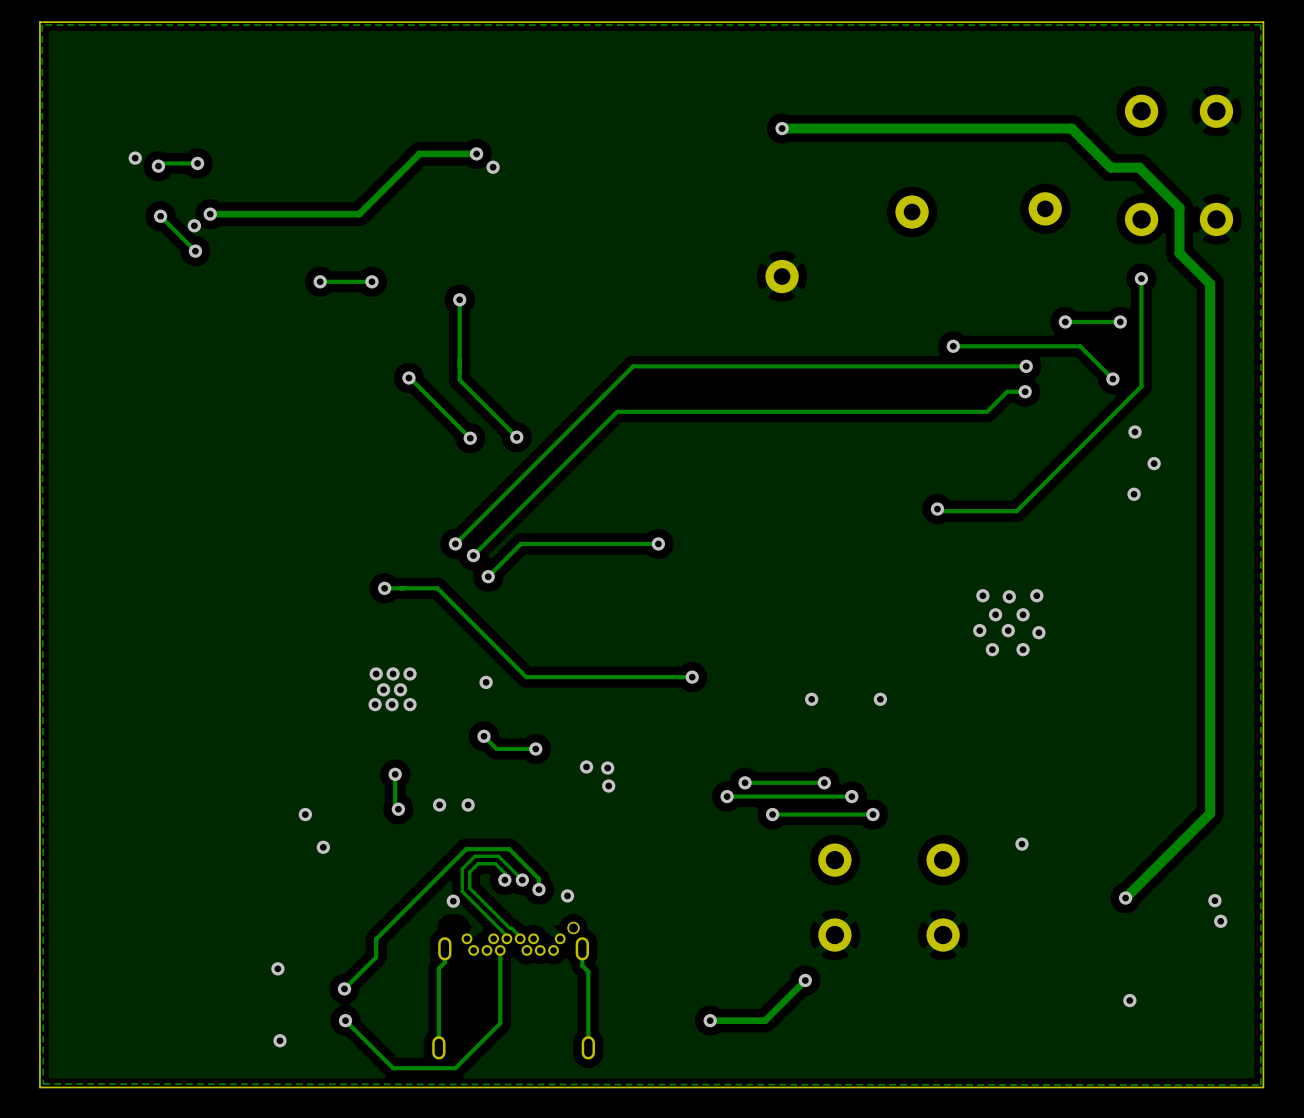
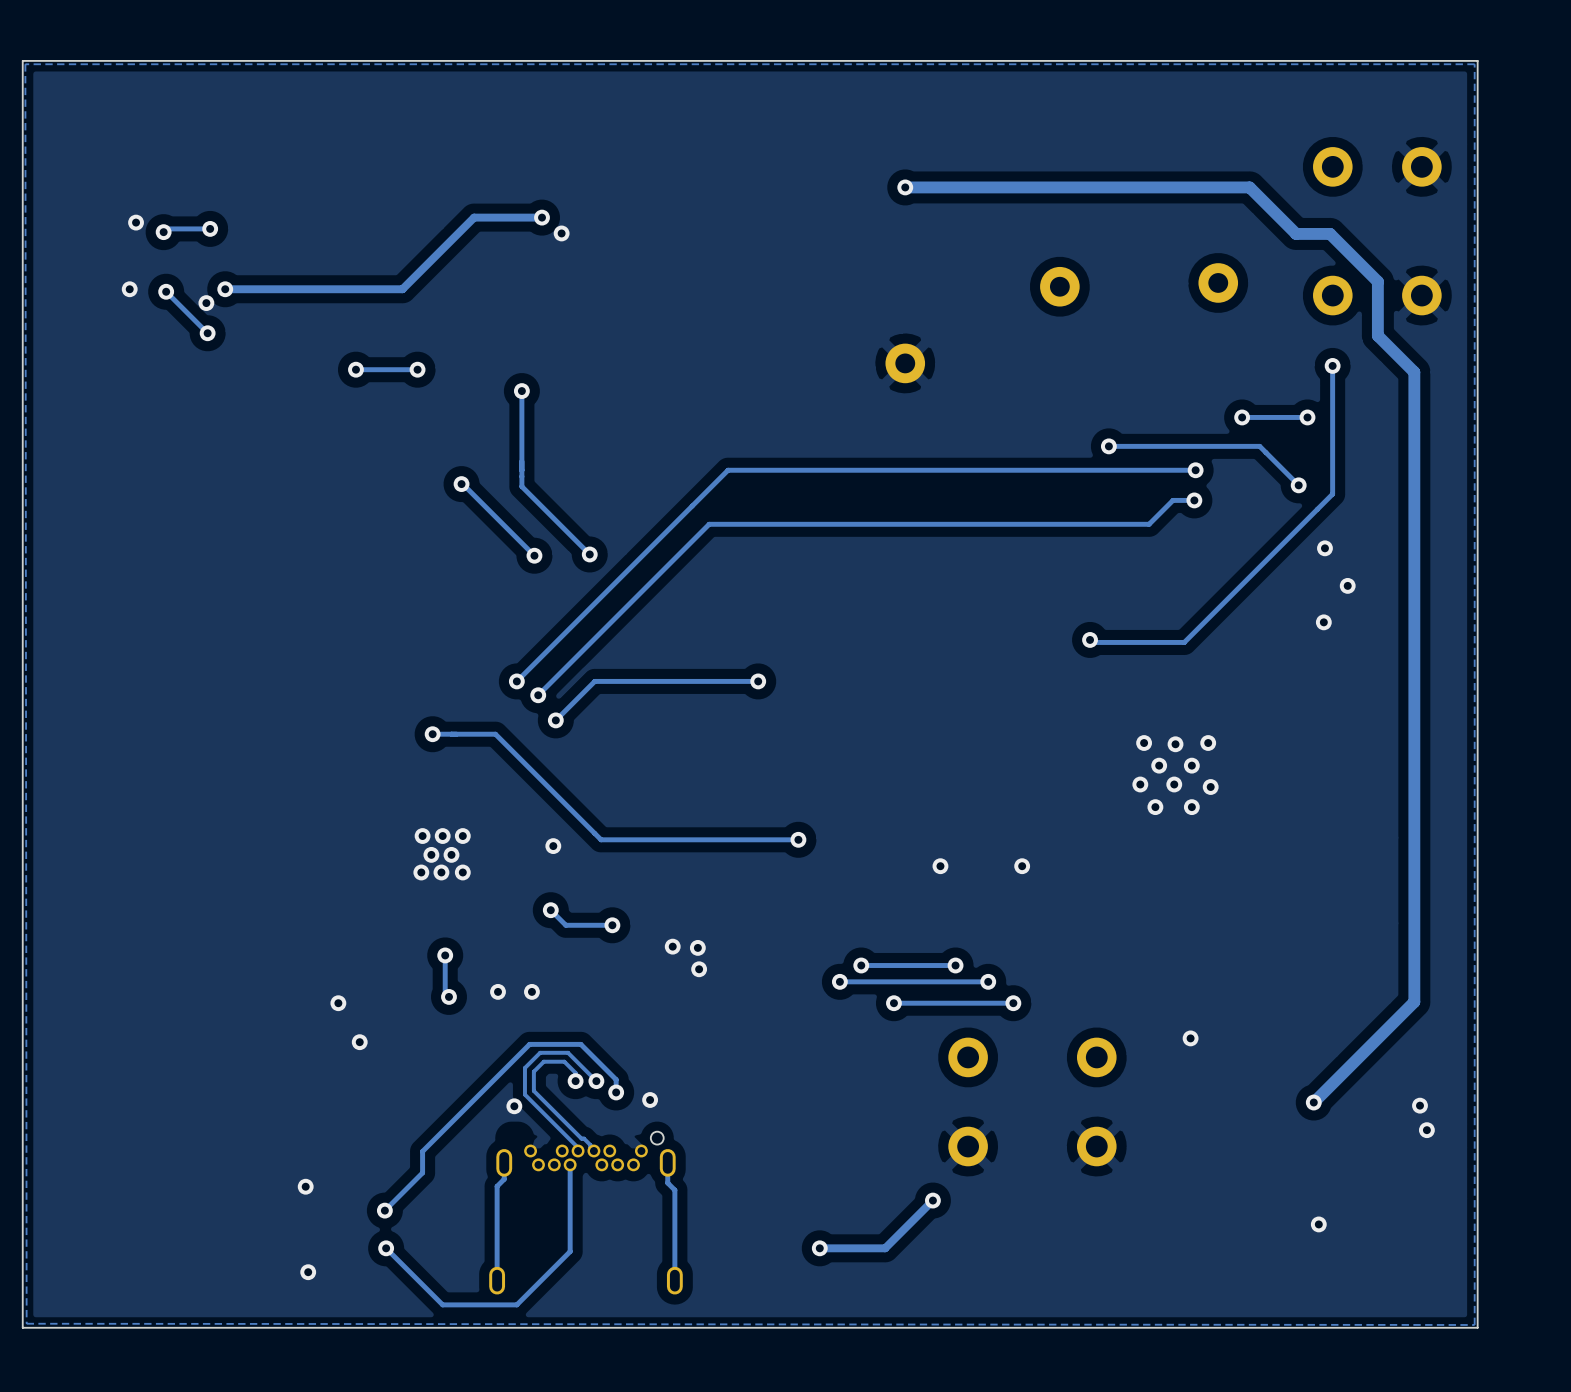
via: none -> (129, 289)

